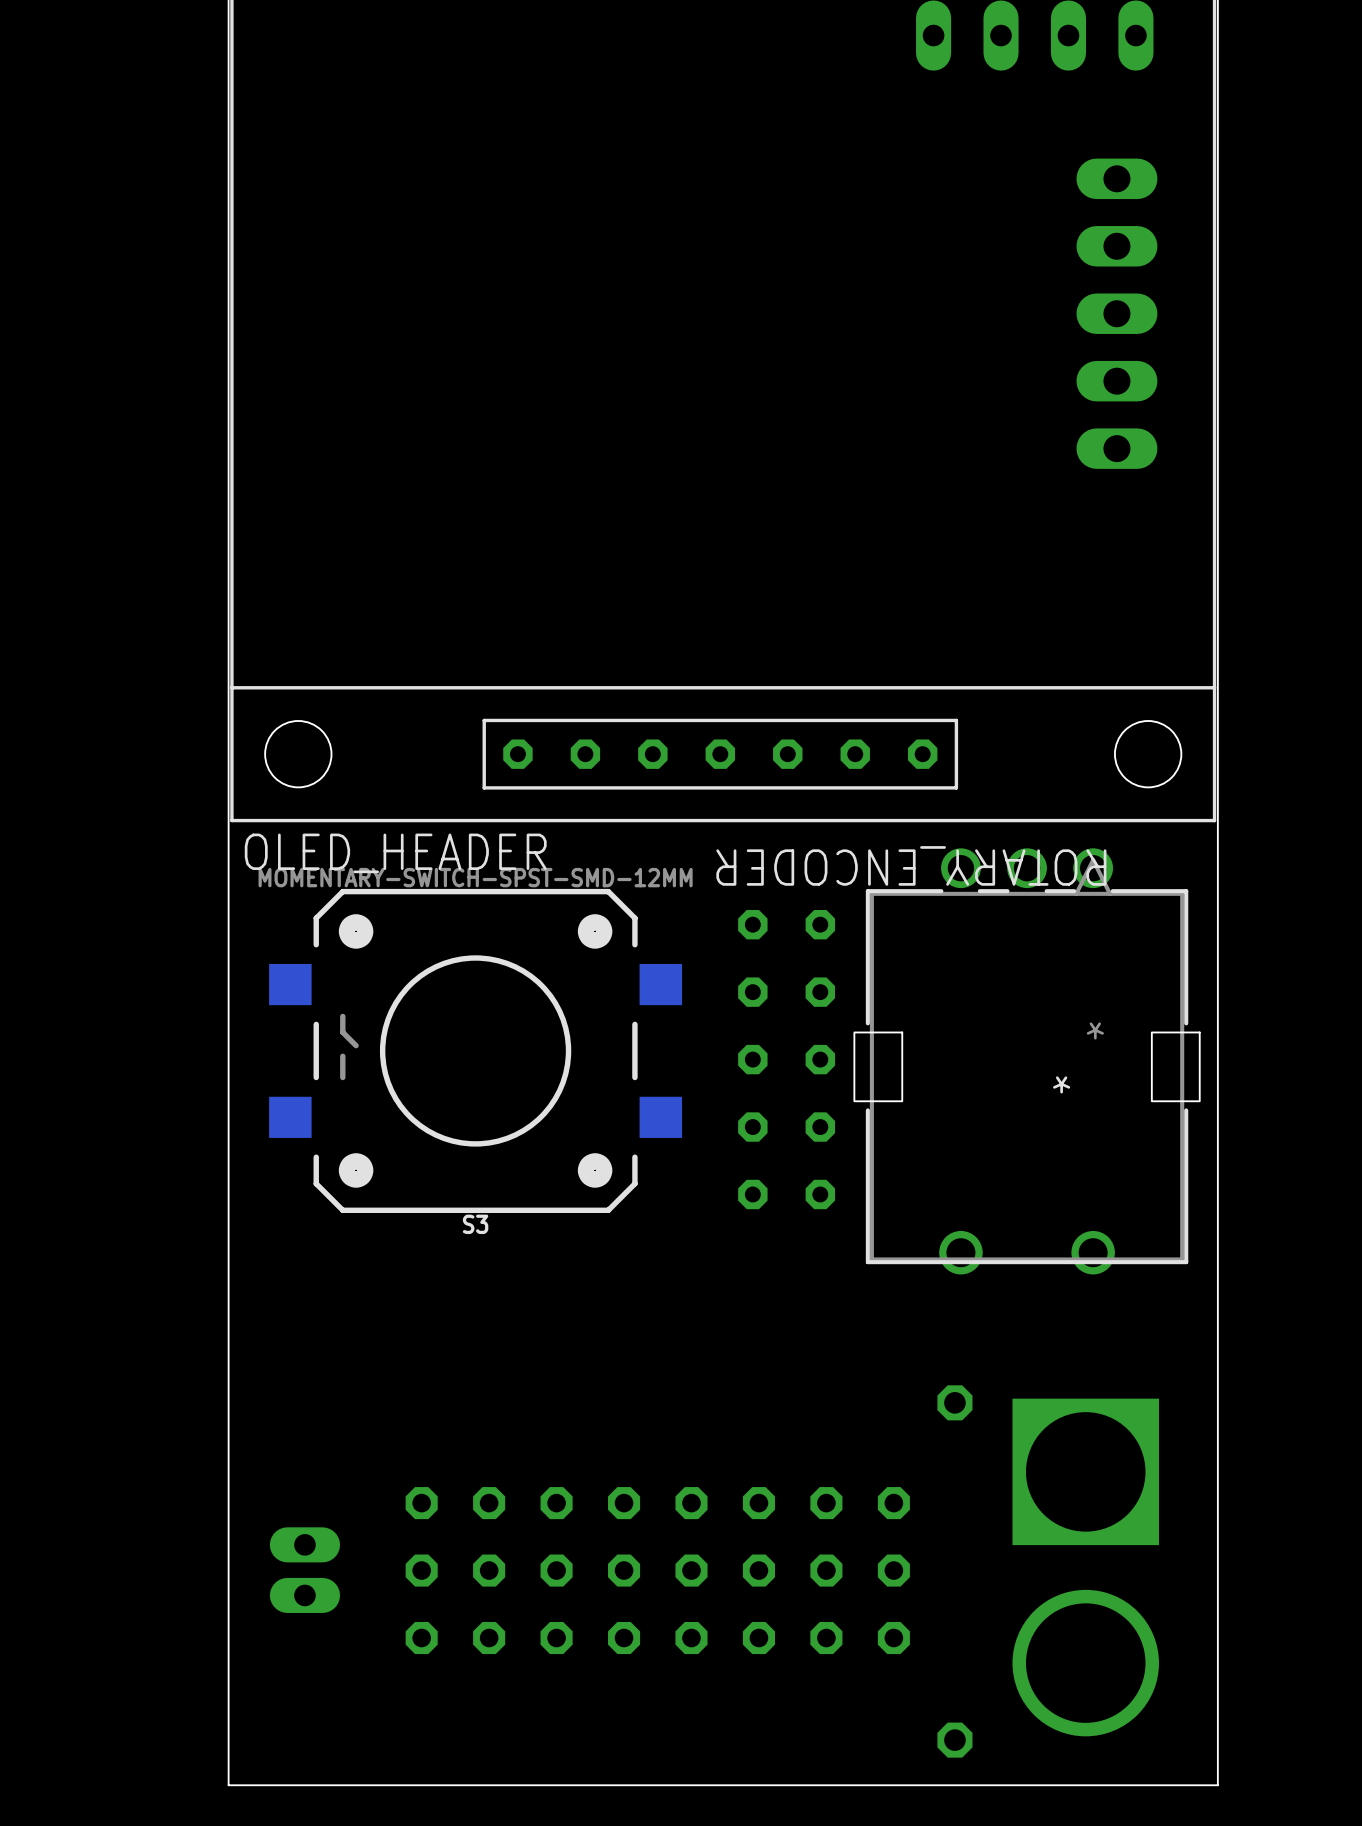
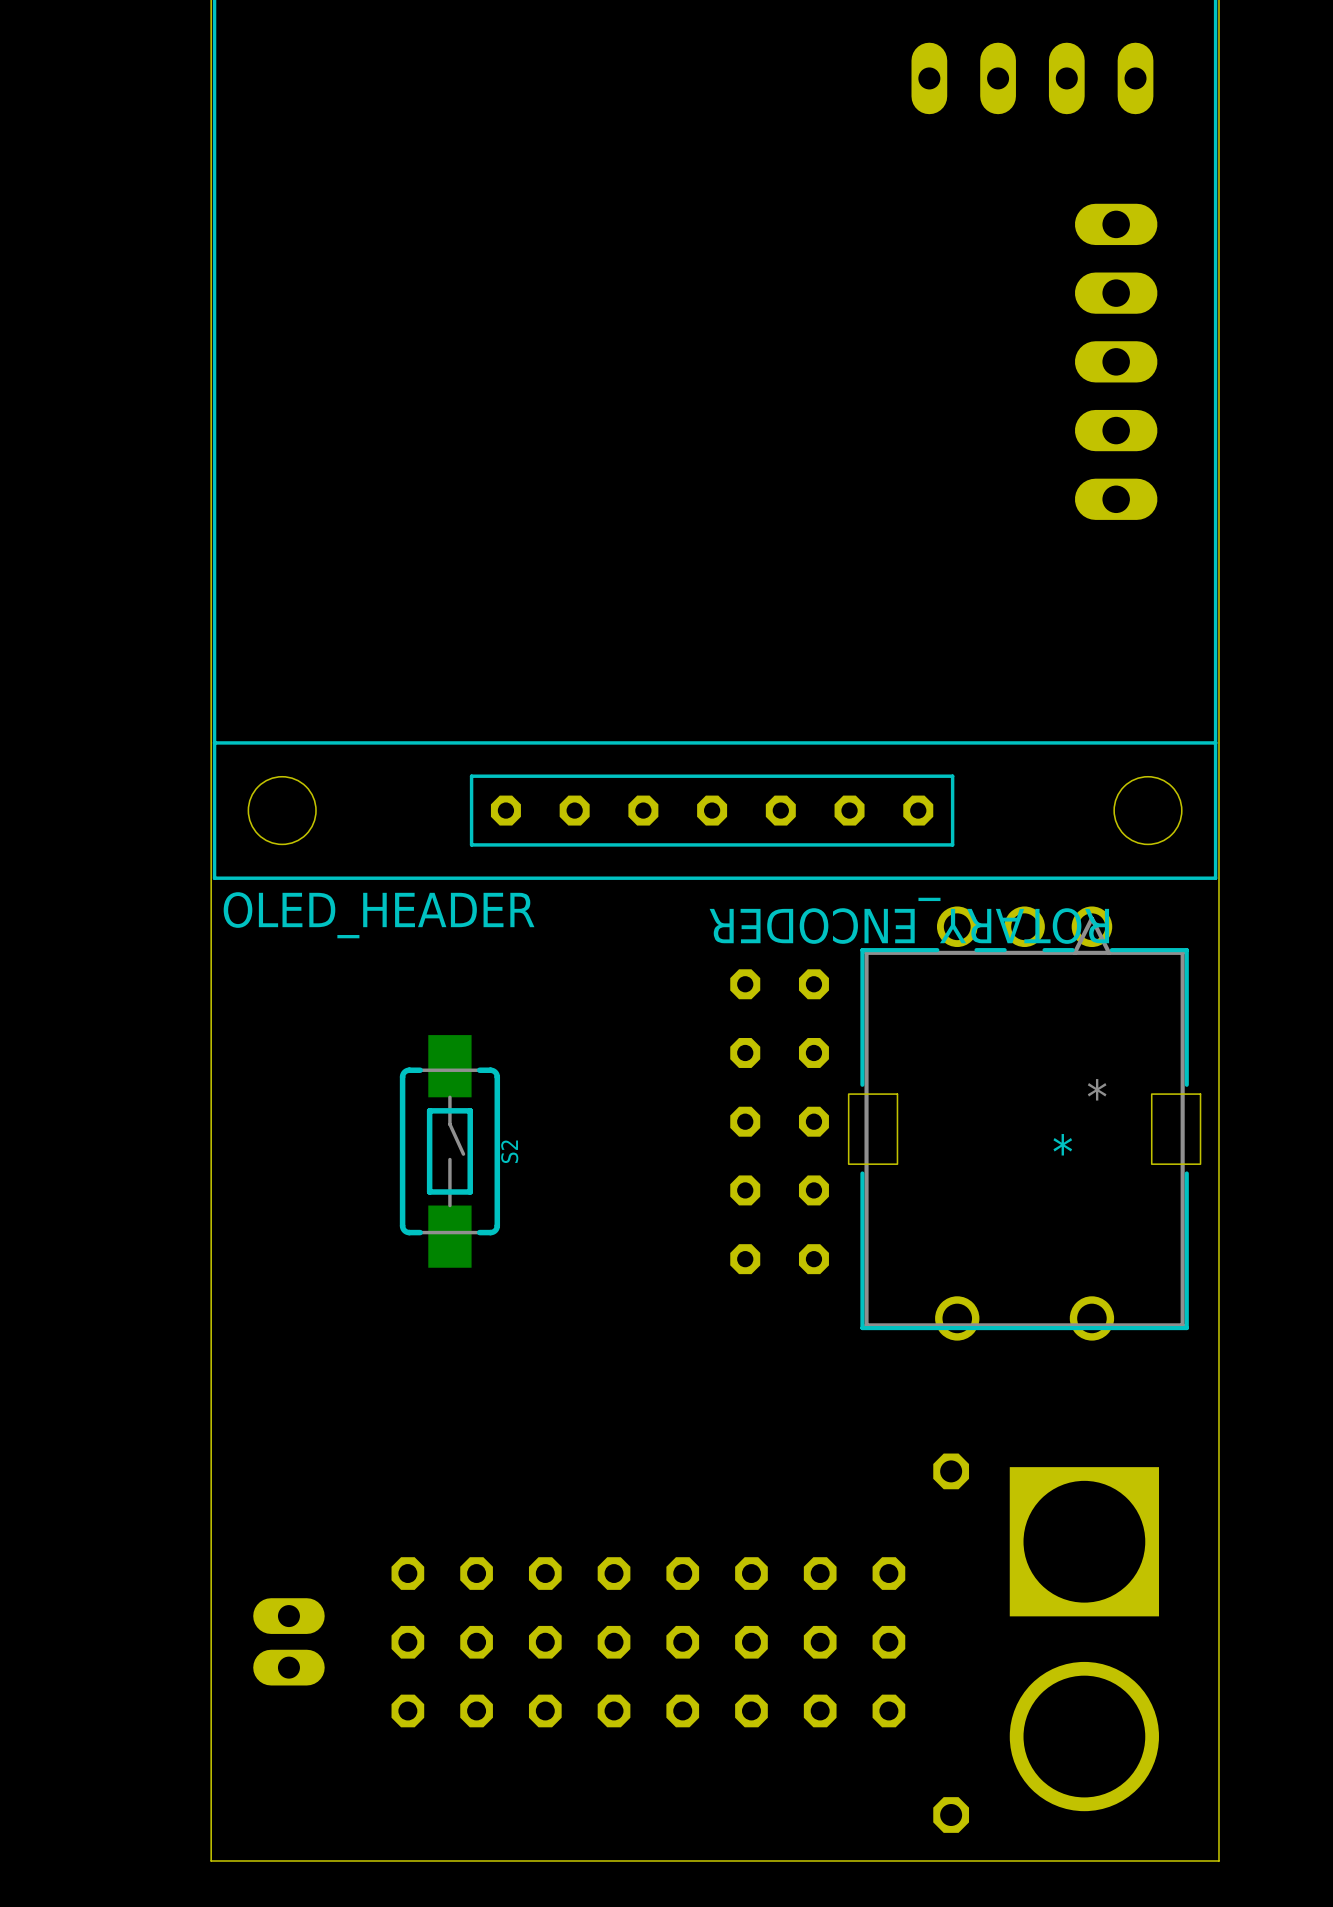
S3: MOMENTARY-SWITCH-SPST-SMD-12MM (475, 1050) -> none
S2: none -> (449, 1151)

